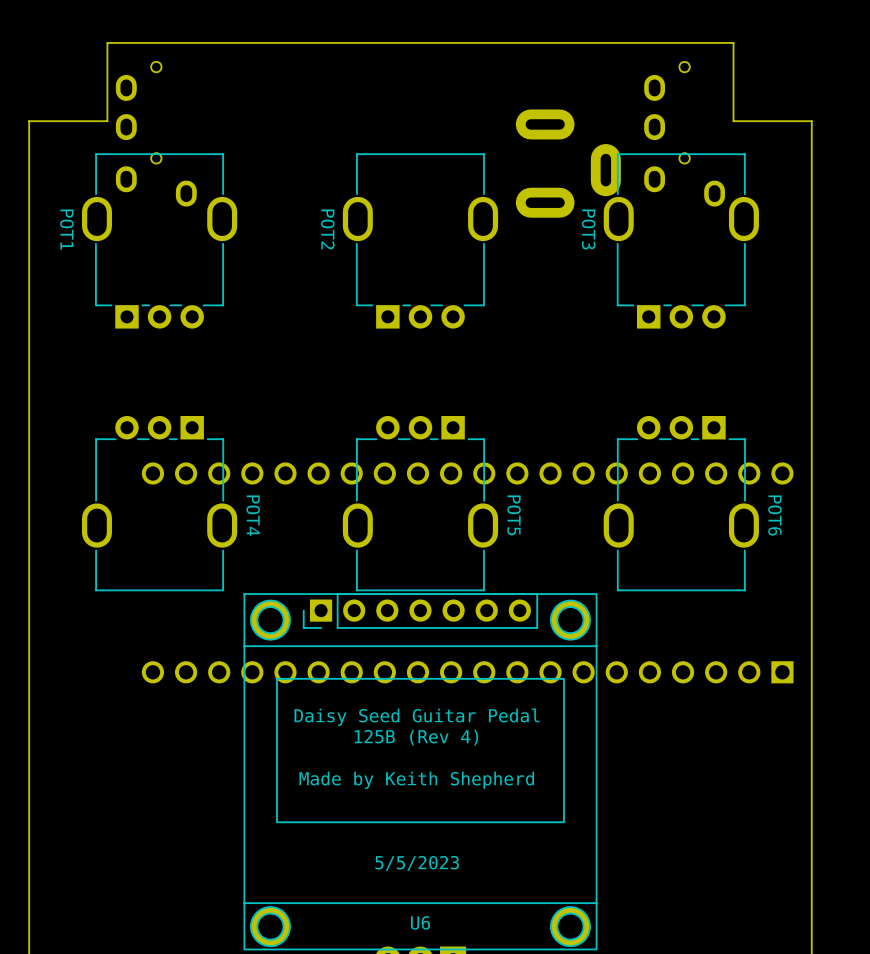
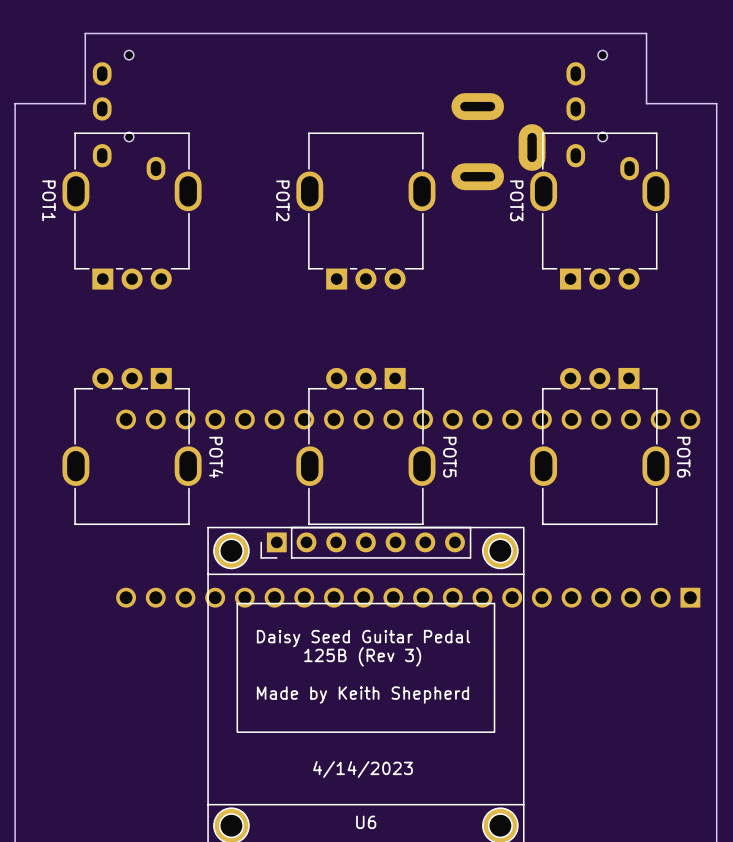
text: 125B (Rev 4) (416, 737) -> 125B (Rev 3) (362, 656)
text: 5/5/2023 (417, 863) -> 4/14/2023 (362, 769)

